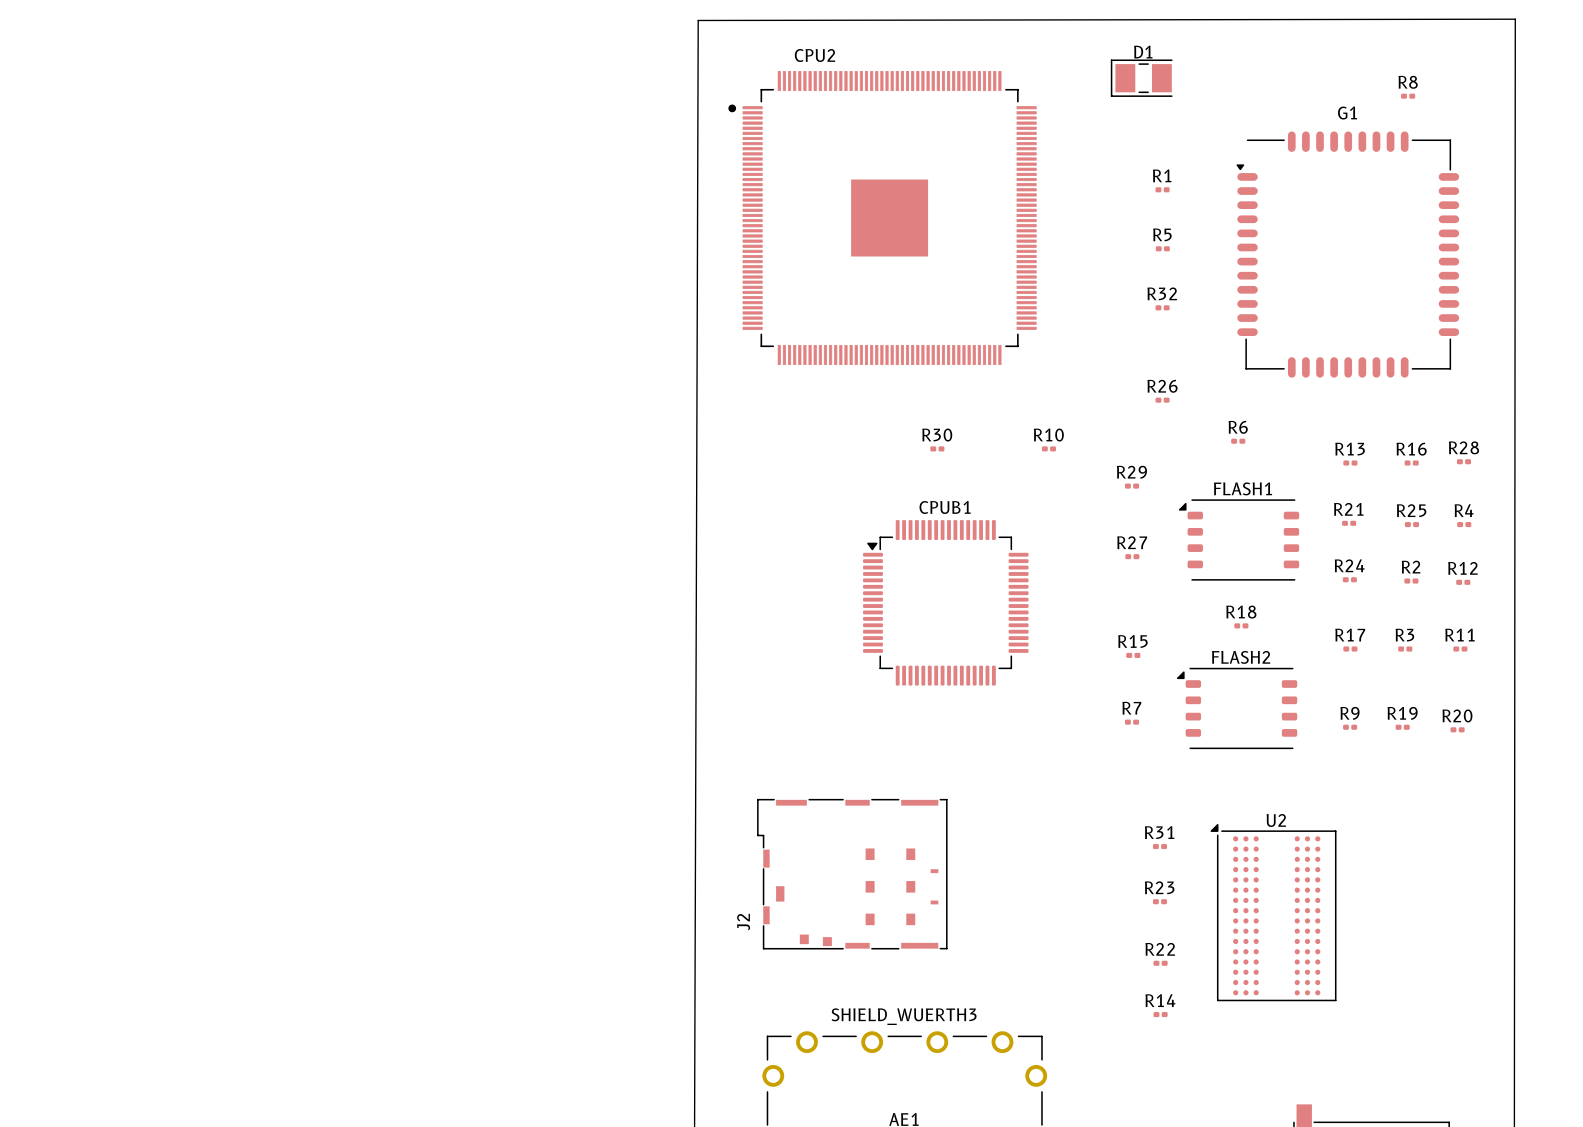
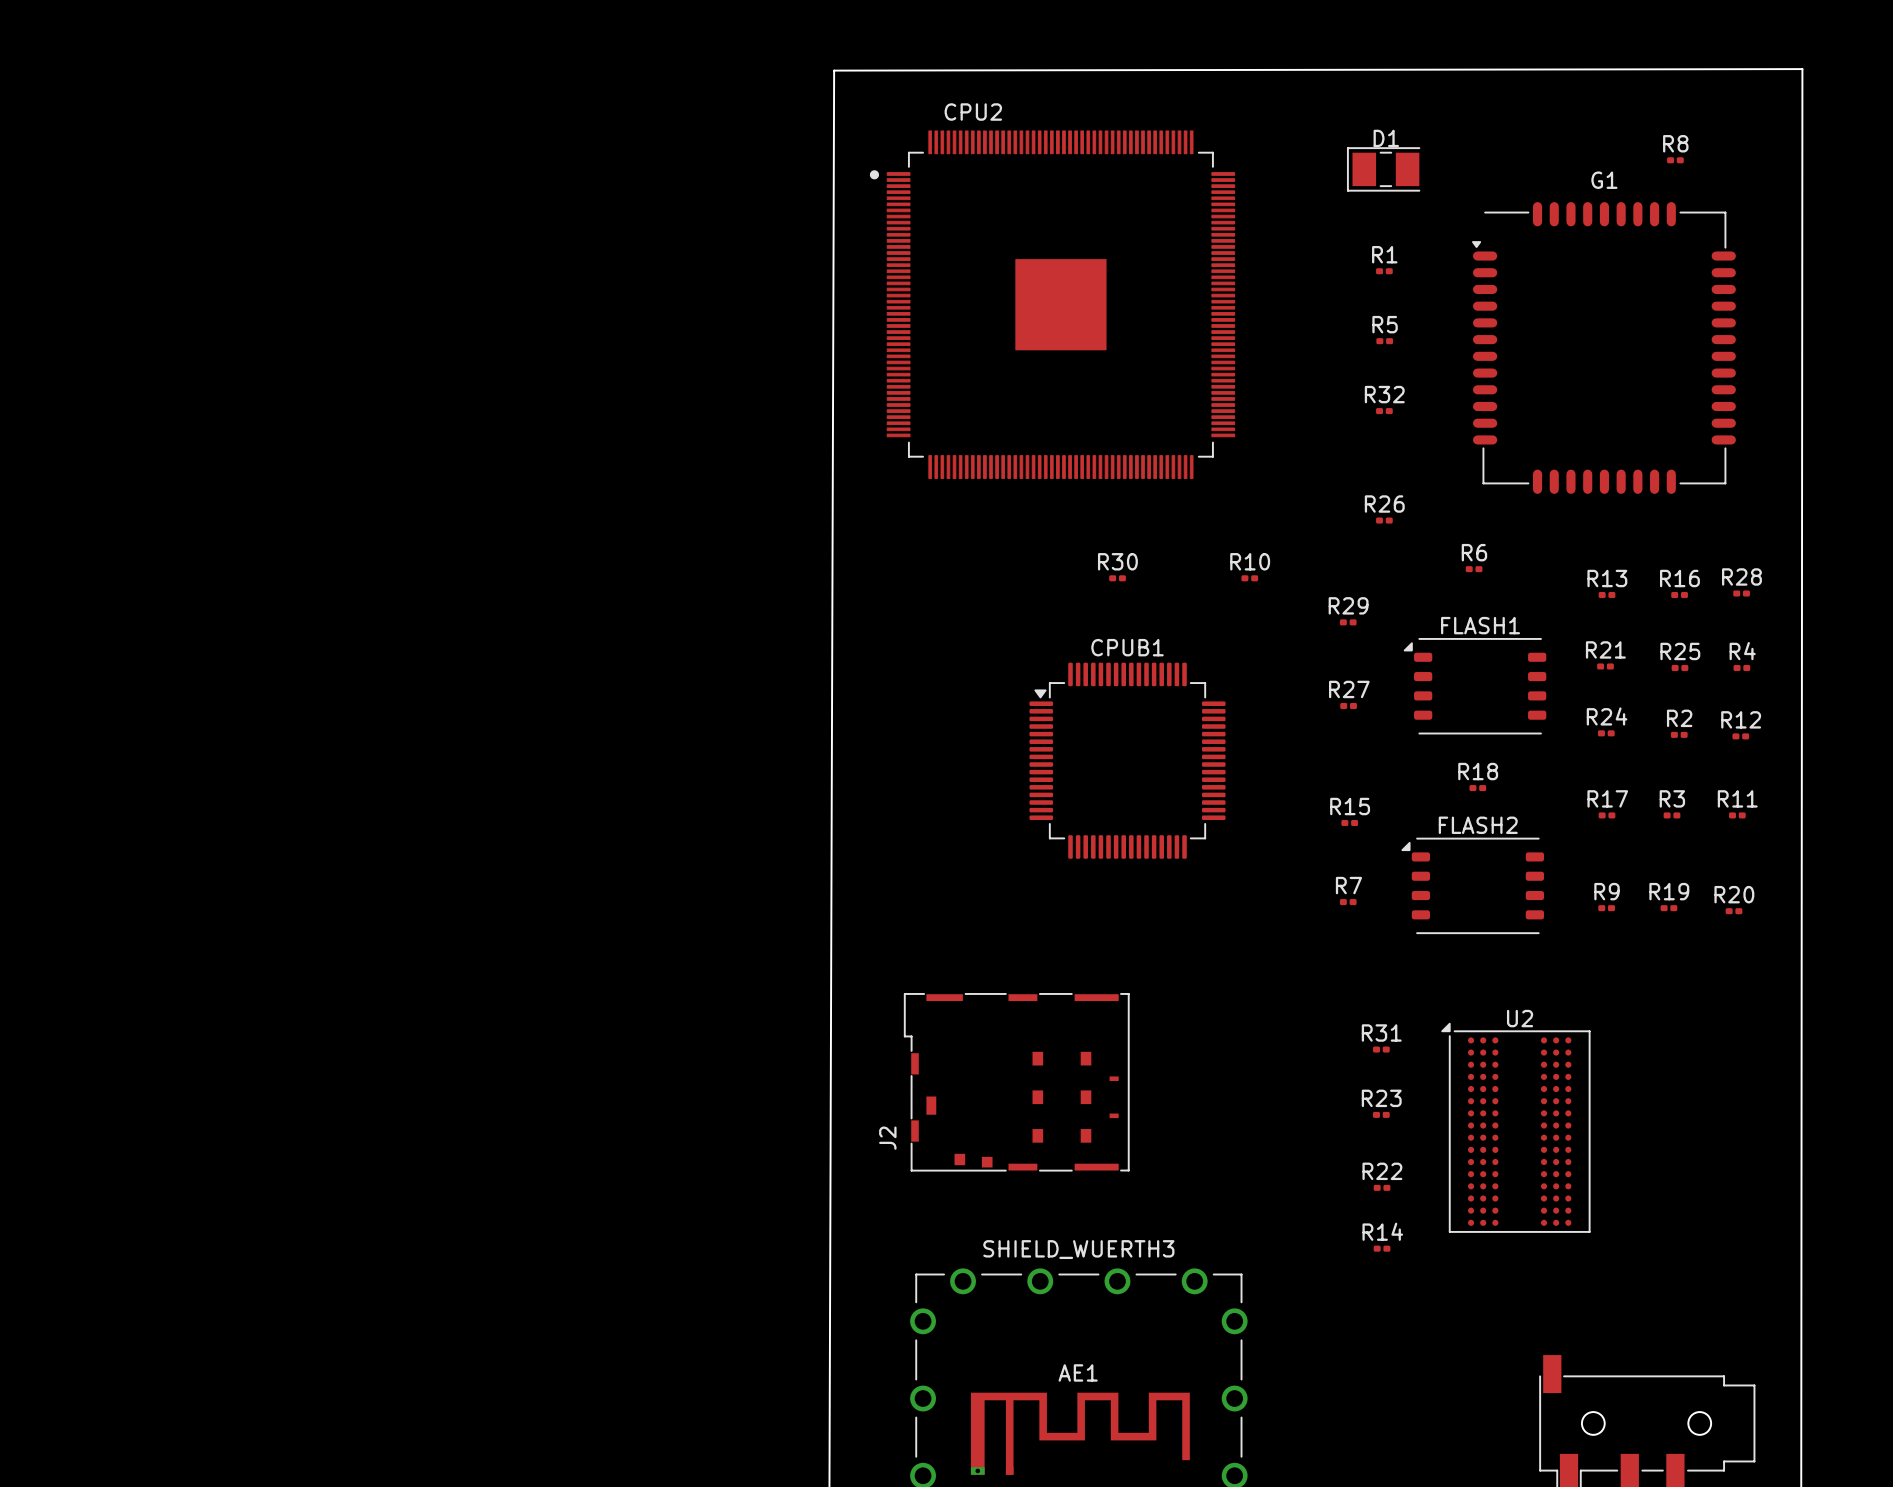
D1 position: (1141, 78) -> (1383, 169)

